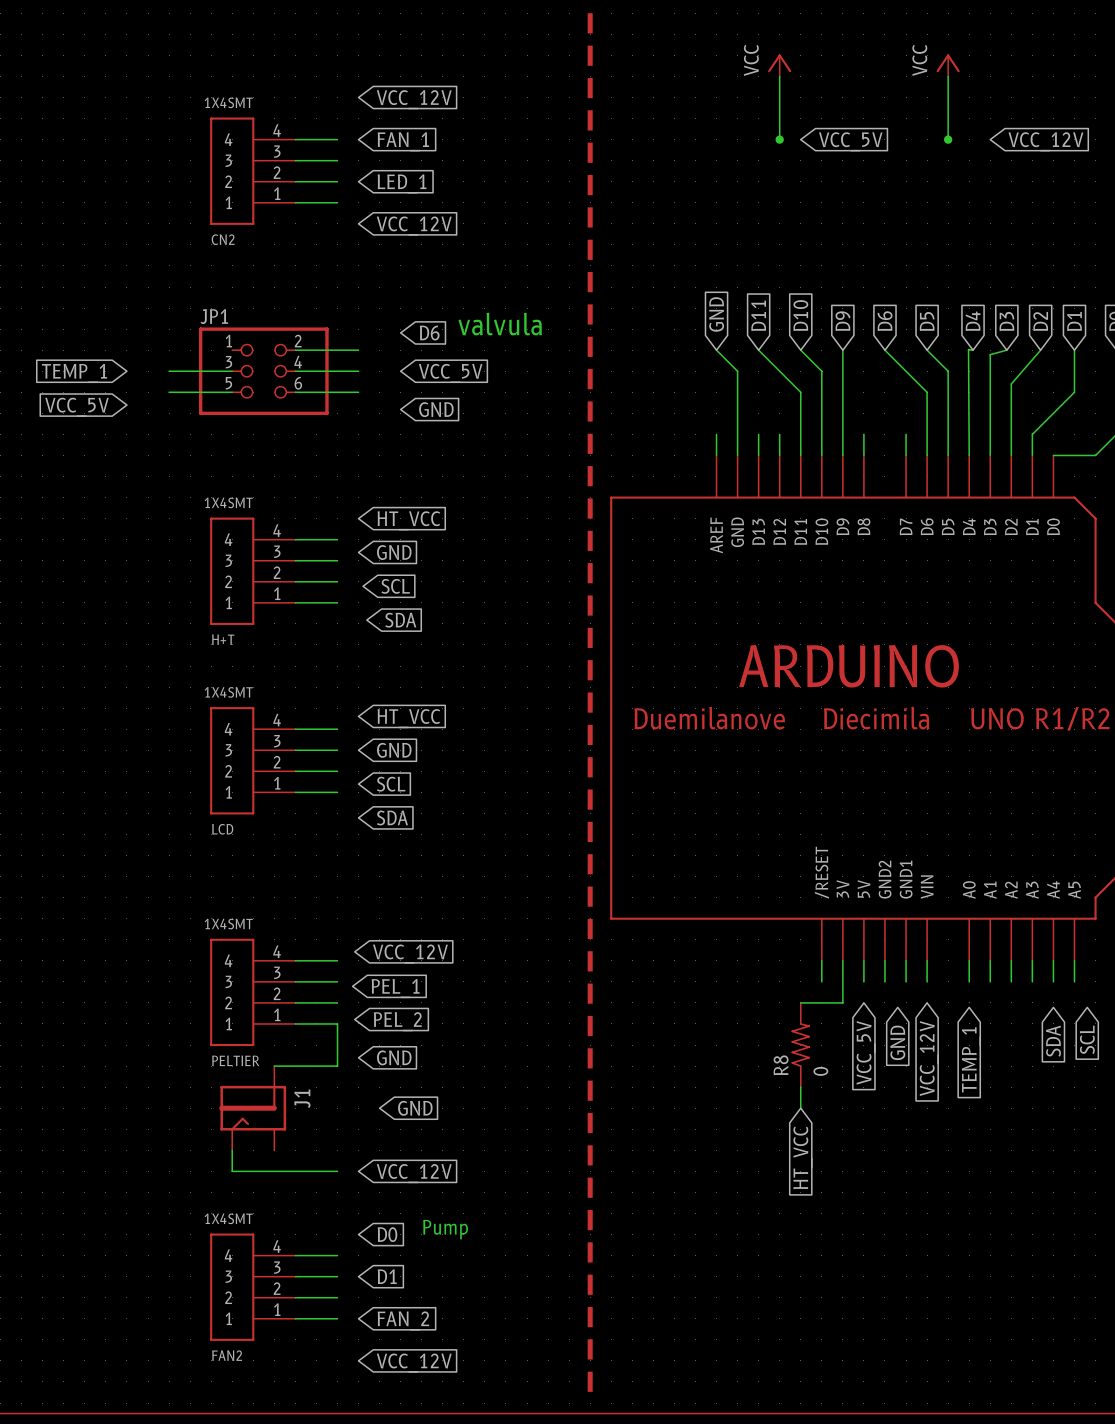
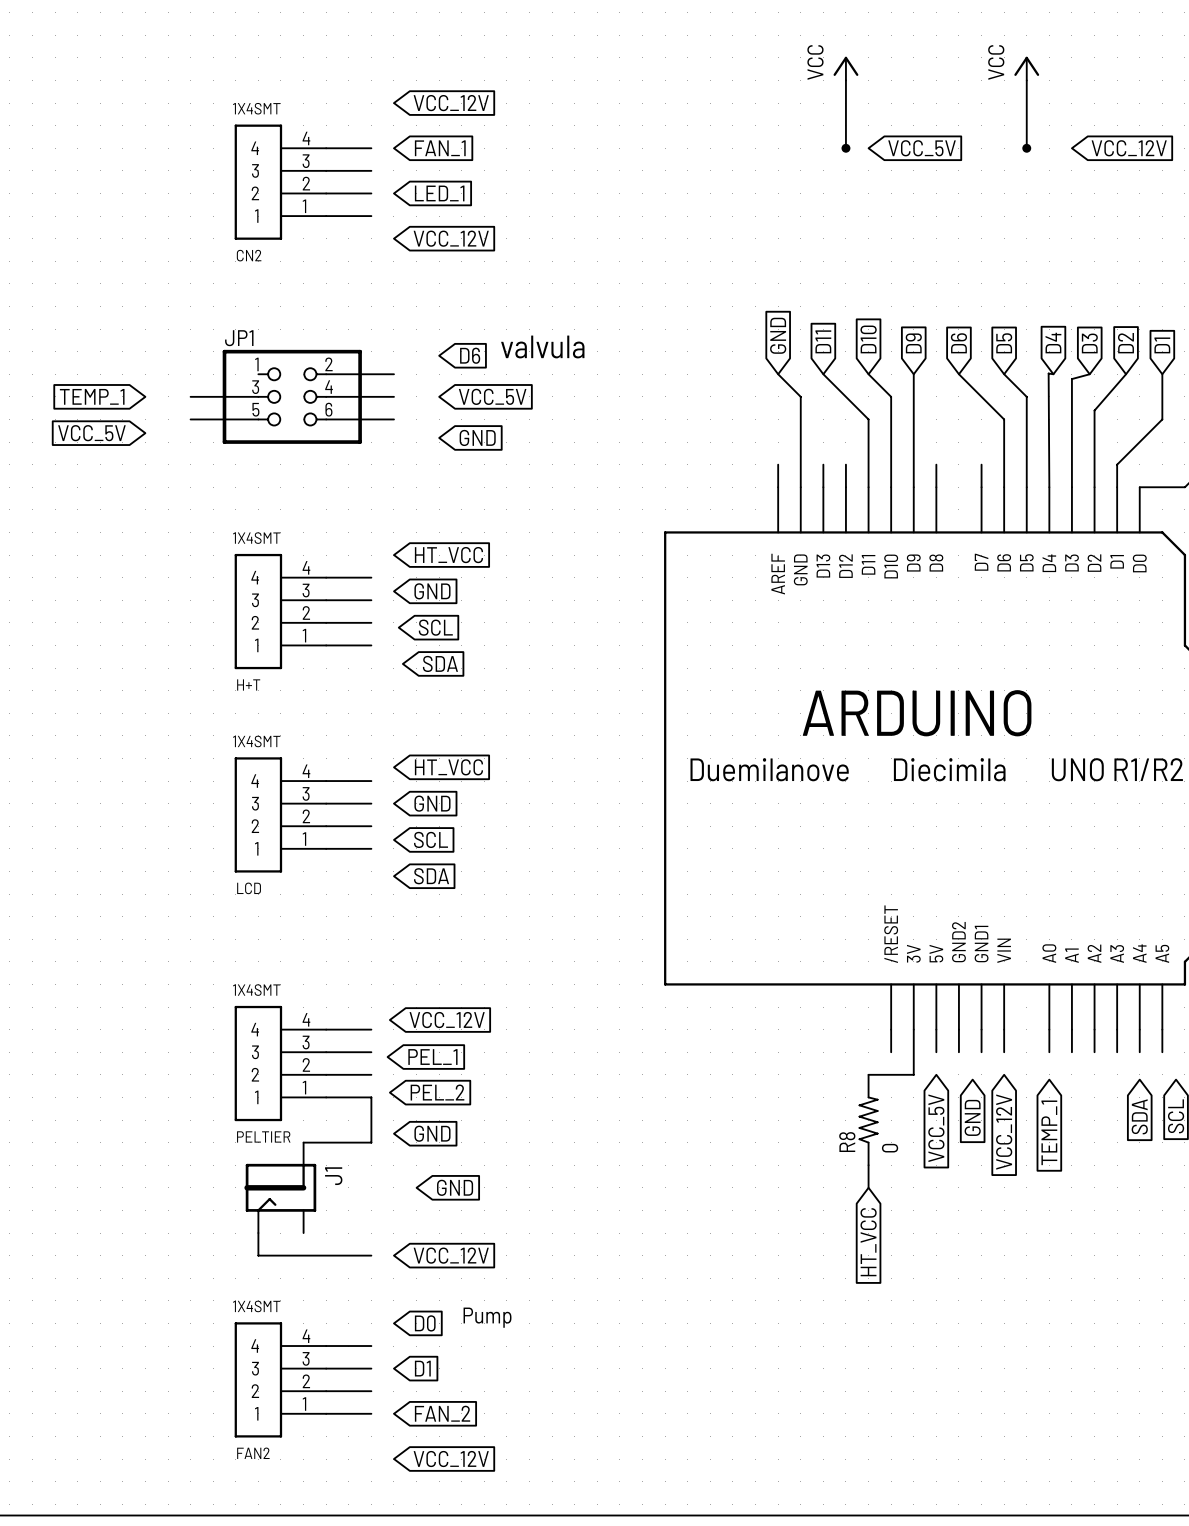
line: (590, 13) (590, 1403) -> none

